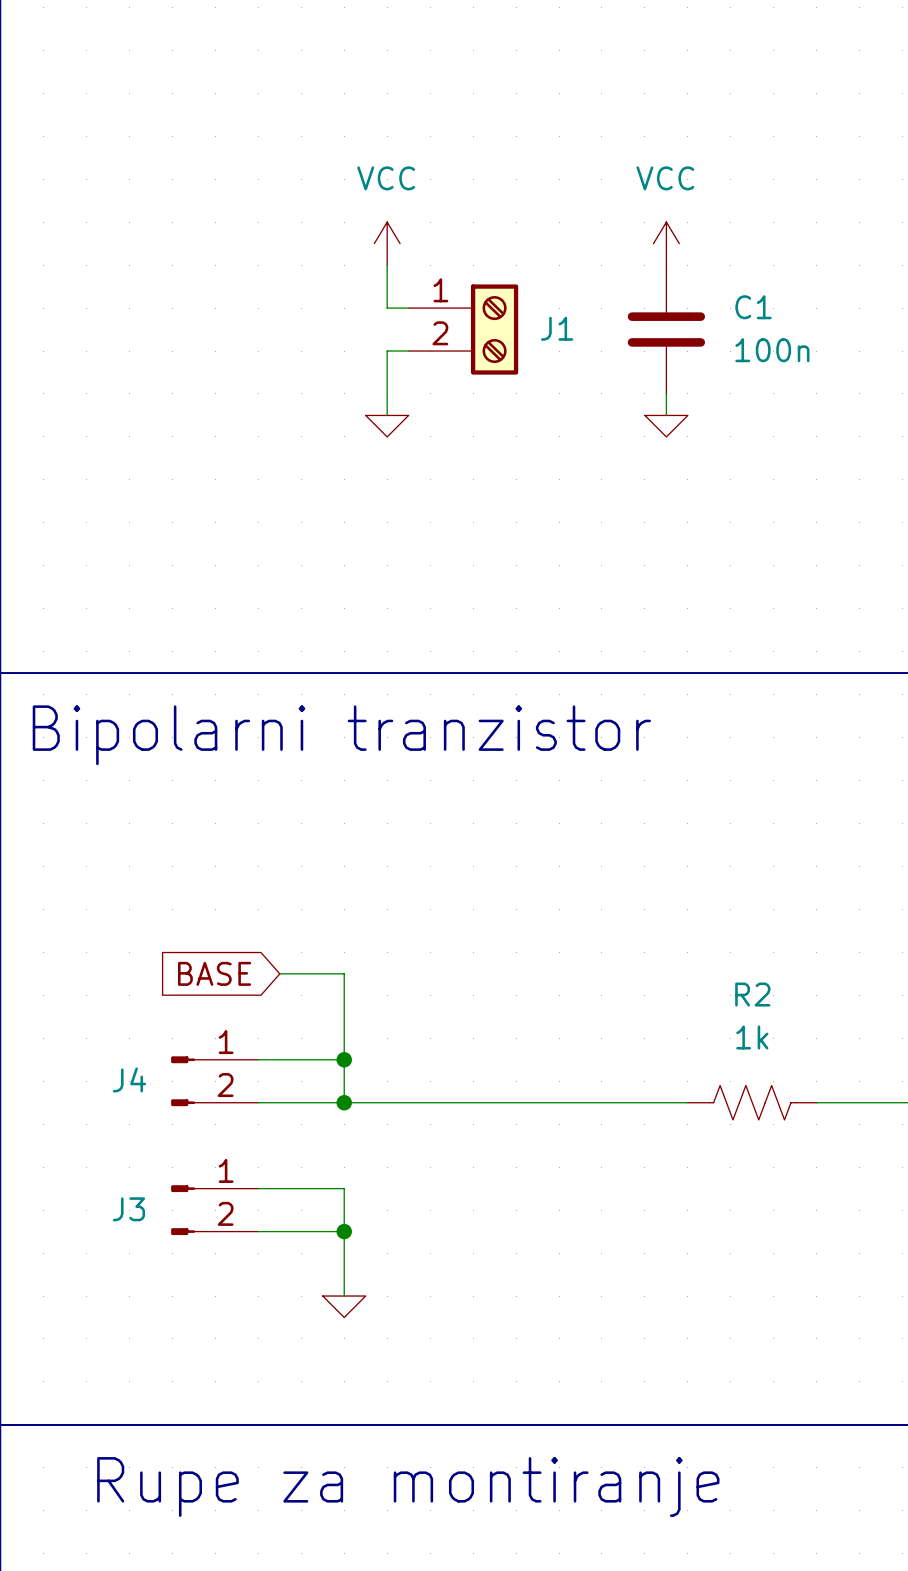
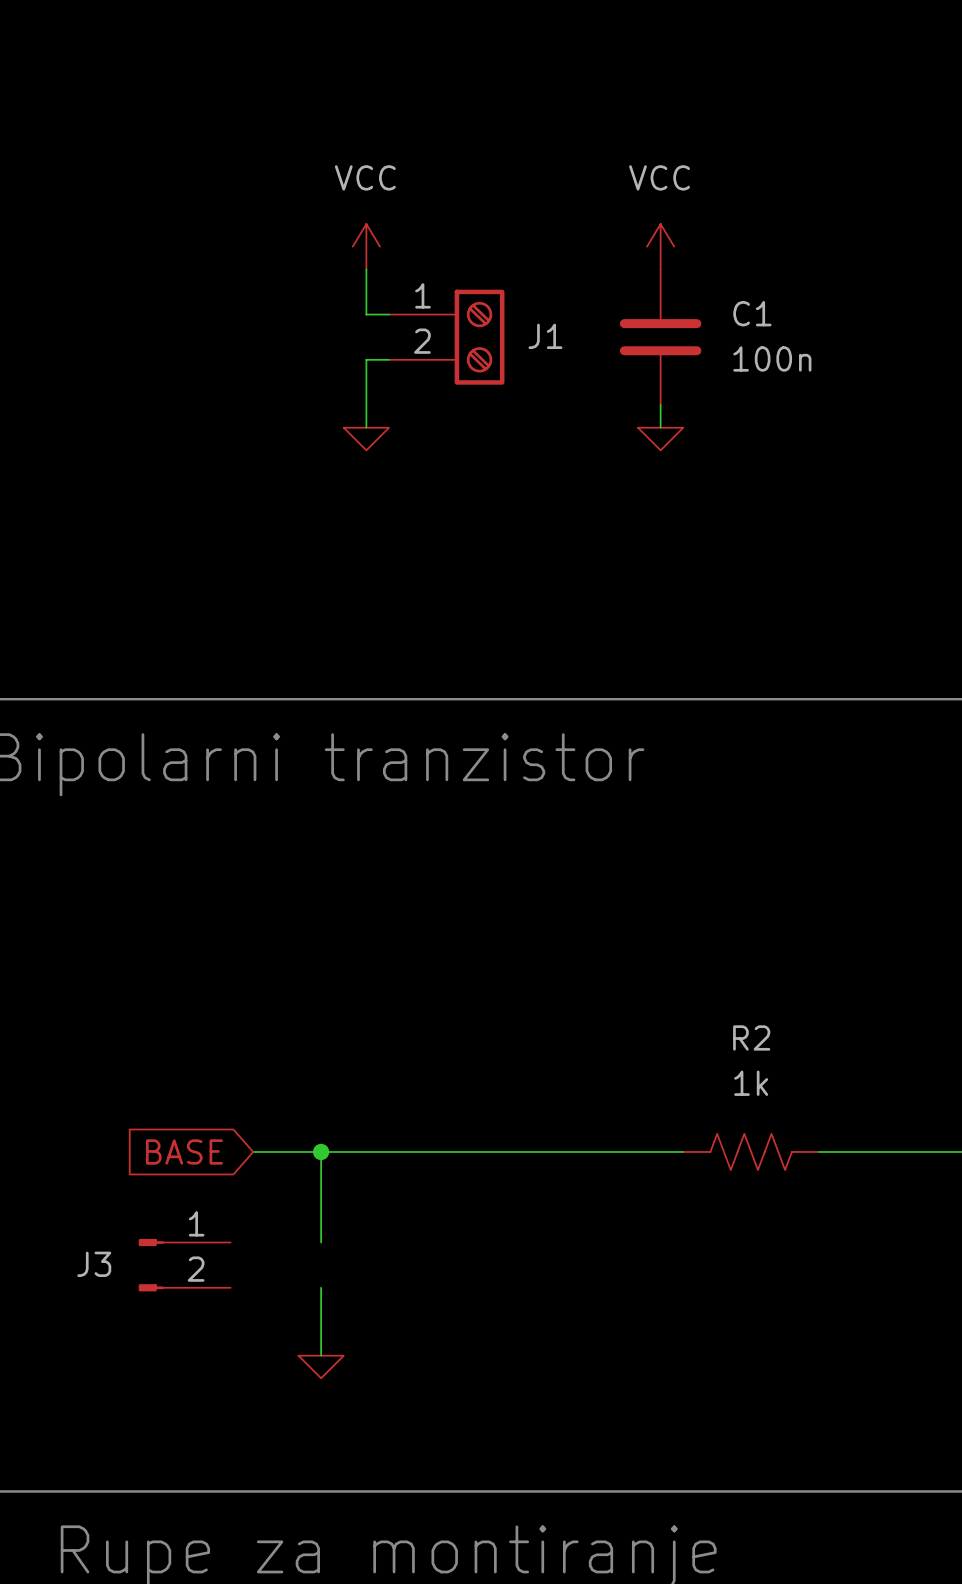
global label position: BASE (214, 973) -> BASE (184, 1151)
wire: (279, 973) (344, 973) (344, 1102) -> (321, 1242) (321, 1151)
wire: (258, 1059) (344, 1059) -> none
junction: (344, 1059) -> none
J4: (214, 1081) -> none
wire: (258, 1102) (279, 1102) -> none
wire: (258, 1188) (344, 1188) (344, 1231) (258, 1231) -> none
junction: (344, 1231) -> none

